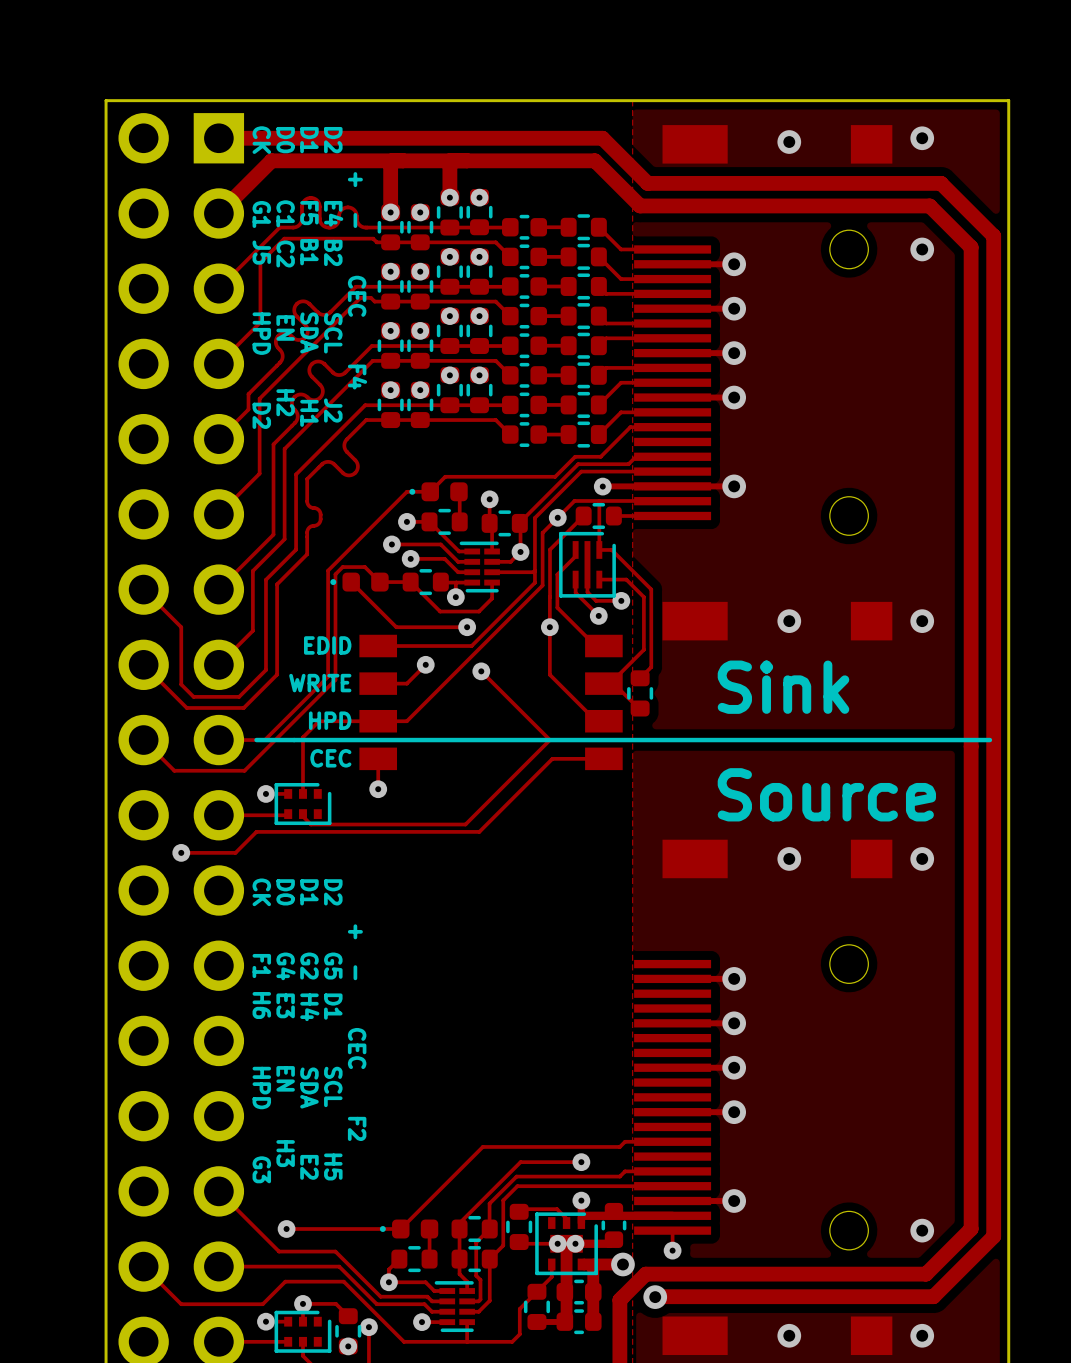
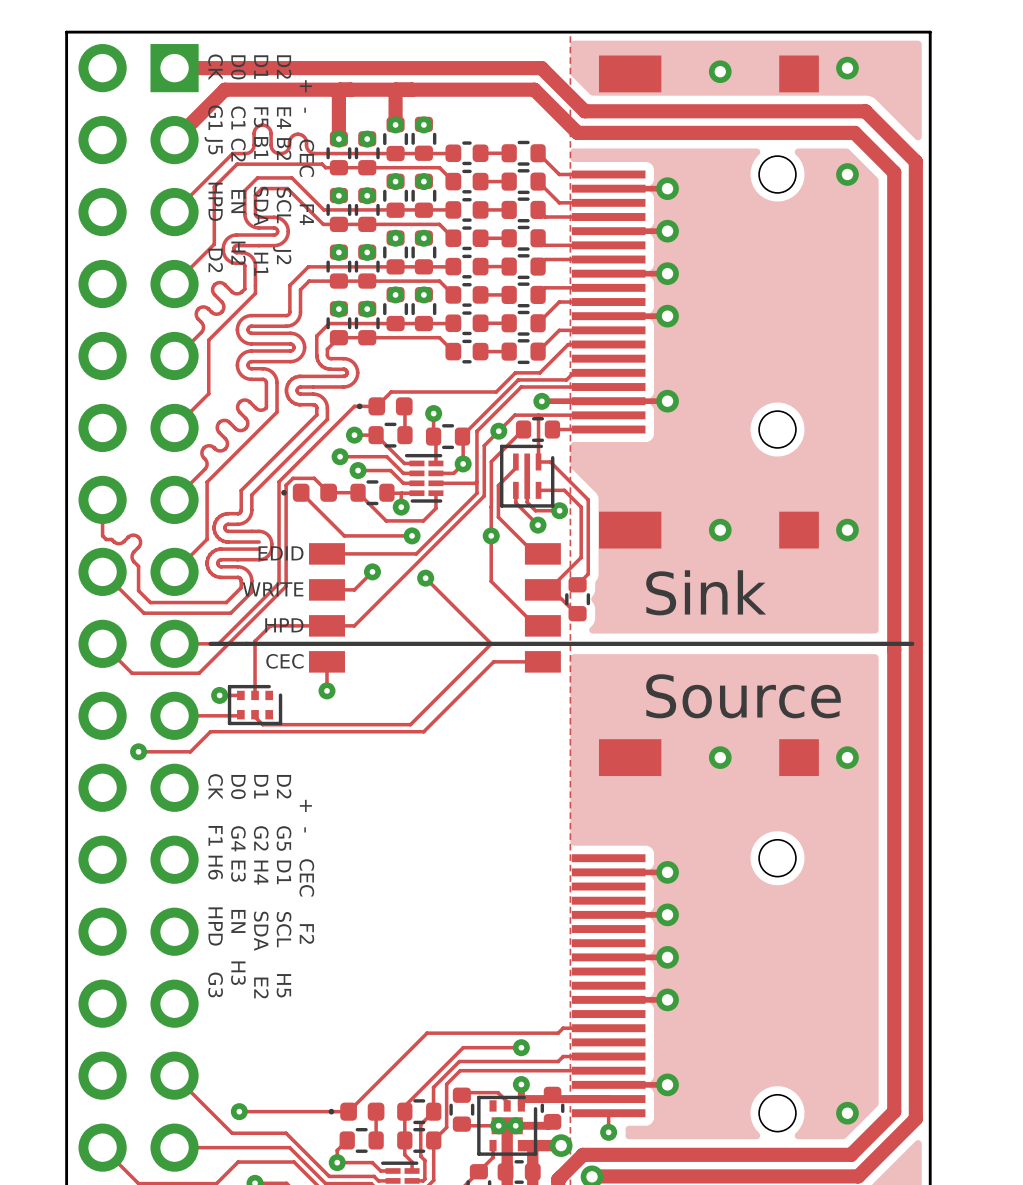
track: (510, 286) (355, 286) (330, 312) (325, 314) (319, 313) (306, 302) (299, 302) (295, 306) (294, 312) (306, 327) (306, 335) (298, 340) (285, 333) (277, 336) (275, 343) (282, 353) (281, 361) (248, 394) (248, 409) (218, 439) -> (453, 209) (323, 209) (291, 177) (257, 177) (244, 190) (245, 219) (253, 226) (275, 228) (277, 232) (274, 235) (234, 235) (226, 240) (223, 248) (226, 258) (231, 262) (244, 265) (244, 289) (236, 293) (222, 283) (214, 284) (213, 292) (223, 303) (222, 310) (215, 314) (205, 307) (198, 309) (196, 315) (202, 324) (202, 330) (177, 355) (174, 355)
track: (374, 301) (370, 297) (360, 297) (259, 398) (259, 473) (254, 478) -> (323, 224) (287, 188) (261, 188) (255, 195) (256, 215) (281, 219) (287, 226) (287, 235) (284, 241) (277, 245) (234, 247) (235, 252) (247, 253) (254, 261) (255, 293) (208, 340) (208, 393)
track: (371, 346) (342, 374) (334, 373) (320, 361) (315, 362) (310, 365) (309, 373) (321, 386) (322, 394) (315, 400) (300, 394) (292, 399) (292, 405) (297, 413) (296, 420) (273, 444) (273, 534) (250, 557) -> (320, 266) (308, 266) (289, 285) (288, 314) (249, 315) (242, 318) (238, 324) (238, 335) (246, 342) (290, 343) (293, 346) (290, 350) (247, 351) (238, 359) (237, 368) (242, 376) (265, 381) (266, 407)
track: (372, 360) (284, 448) (284, 539) -> (321, 281) (309, 281) (300, 289) (300, 315) (293, 324) (286, 326) (251, 326) (248, 327) (248, 331) (251, 333) (295, 334) (302, 340) (304, 349) (300, 357) (294, 361) (251, 361) (248, 363) (250, 368) (266, 369) (275, 375) (277, 382) (277, 412) (237, 451)
track: (380, 405) (365, 405) (296, 474) (296, 549) (265, 579) (265, 670) (239, 696) -> (329, 323) (316, 335) (317, 360) (325, 368) (344, 369) (347, 373) (344, 376) (298, 376) (289, 381) (286, 390) (289, 399) (298, 404) (314, 404) (316, 407) (316, 414) (241, 490) (240, 512) (222, 514) (215, 522) (215, 533) (222, 541) (259, 542)
track: (390, 420) (366, 420) (345, 440) (345, 449) (357, 464) (357, 469) (353, 474) (345, 474) (332, 463) (327, 461) (322, 463) (307, 479) (307, 503) (310, 507) (319, 510) (320, 520) (318, 524) (310, 526) (307, 530) (307, 554) (277, 584) (277, 674) (243, 707) -> (338, 337) (327, 349) (327, 356) (330, 358) (345, 358) (352, 361) (357, 370) (355, 379) (345, 386) (298, 388) (297, 391) (299, 393) (315, 394) (323, 398) (327, 406) (327, 419) (251, 494) (251, 511) (247, 520) (241, 523) (227, 524) (225, 526) (227, 531) (262, 531) (270, 539) (270, 551) (263, 558) (220, 559) (218, 561) (220, 566) (239, 566) (247, 570) (251, 579) (251, 592) (230, 613) (198, 613)
track: none -> (266, 408) (258, 409) (246, 400) (239, 402) (238, 409) (247, 420) (247, 426) (239, 430) (226, 420) (219, 422) (217, 429) (226, 439) (227, 446) (221, 450) (210, 445) (204, 447) (201, 452) (206, 462) (204, 469)
track: (143, 589) (181, 627) (181, 659) -> (102, 499) (102, 535) (106, 539) (111, 539) (118, 543) (130, 535) (137, 536) (140, 544) (132, 556) (138, 566)
track: none -> (259, 549) (219, 549) (212, 551) (207, 561) (209, 571) (219, 577) (238, 577) (241, 580) (241, 587) (226, 602) (193, 602)

